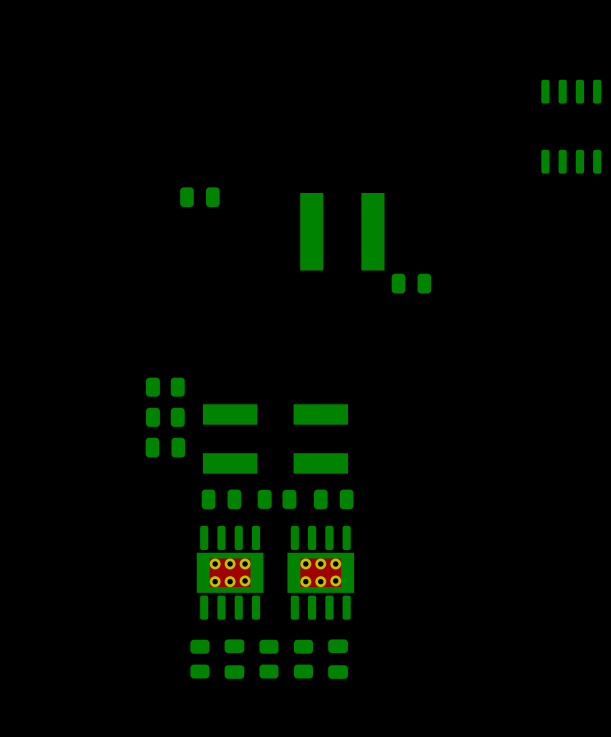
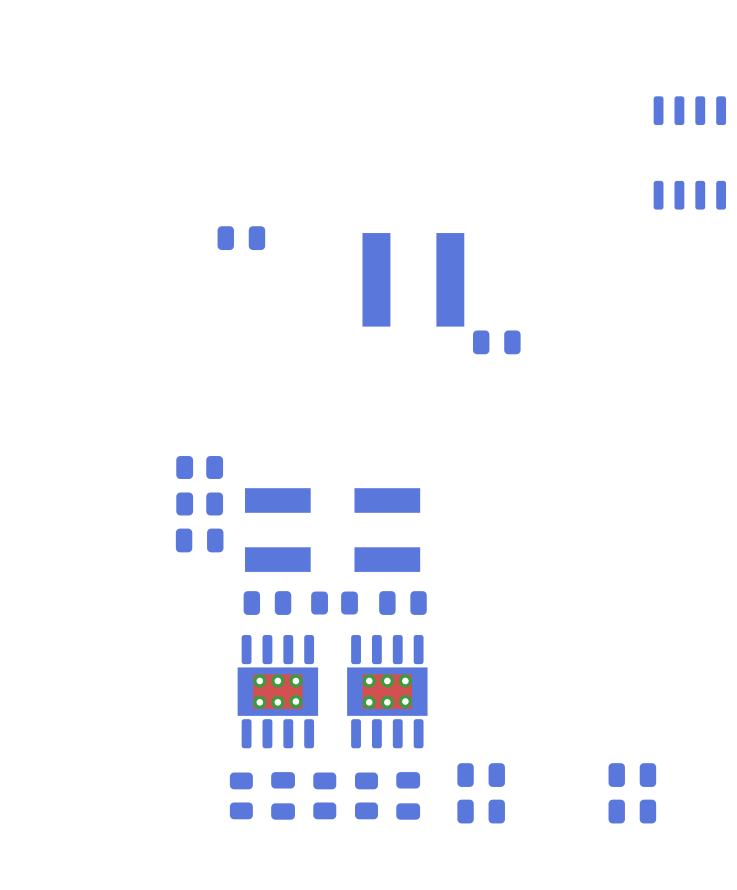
part: none -> (481, 775)
part: none -> (632, 775)
part: none -> (481, 811)
part: none -> (632, 811)

